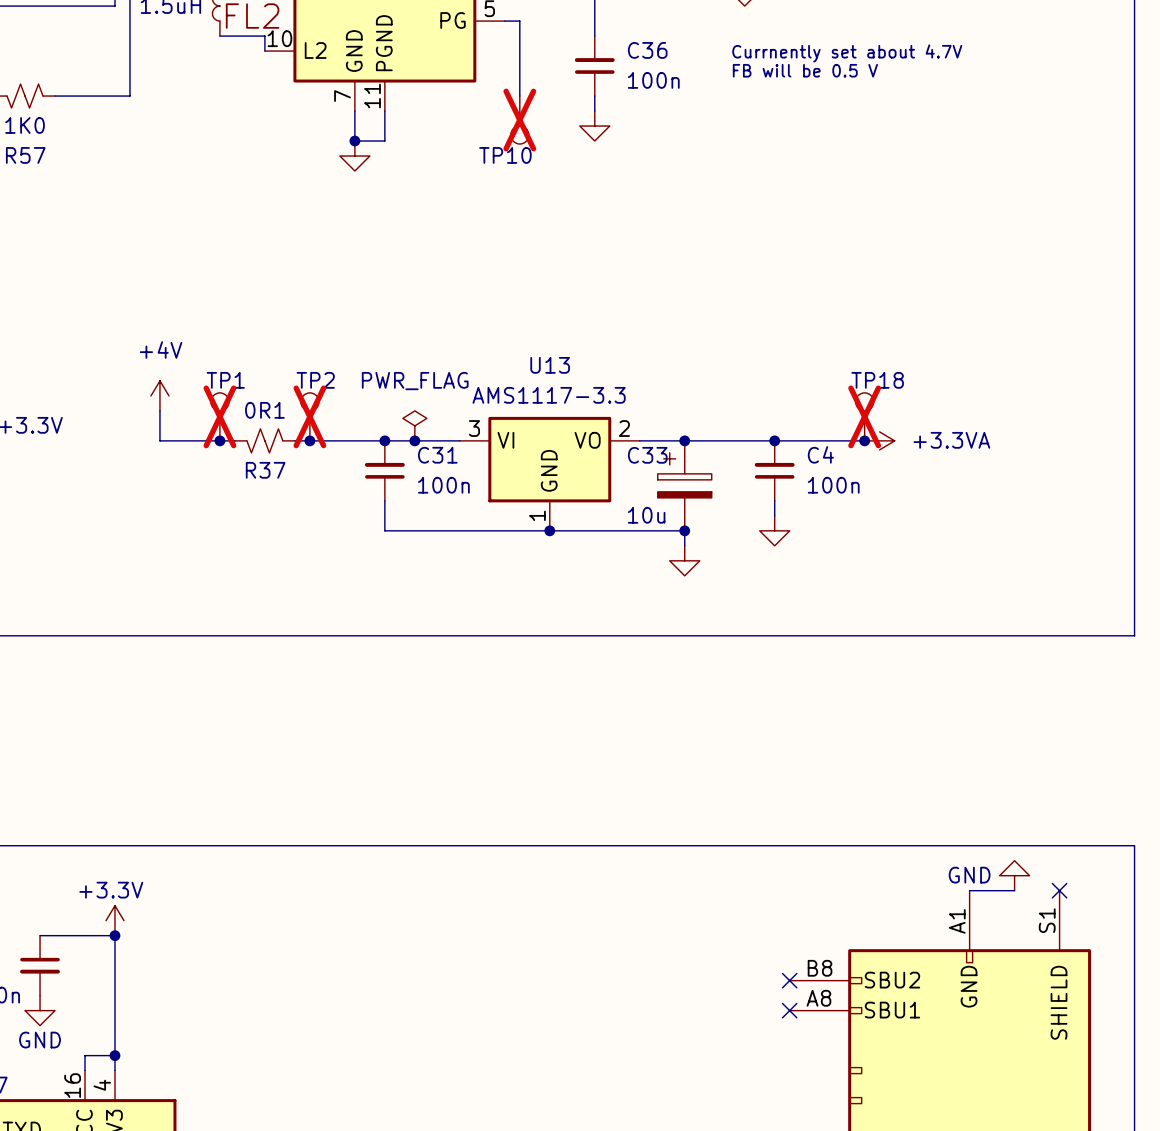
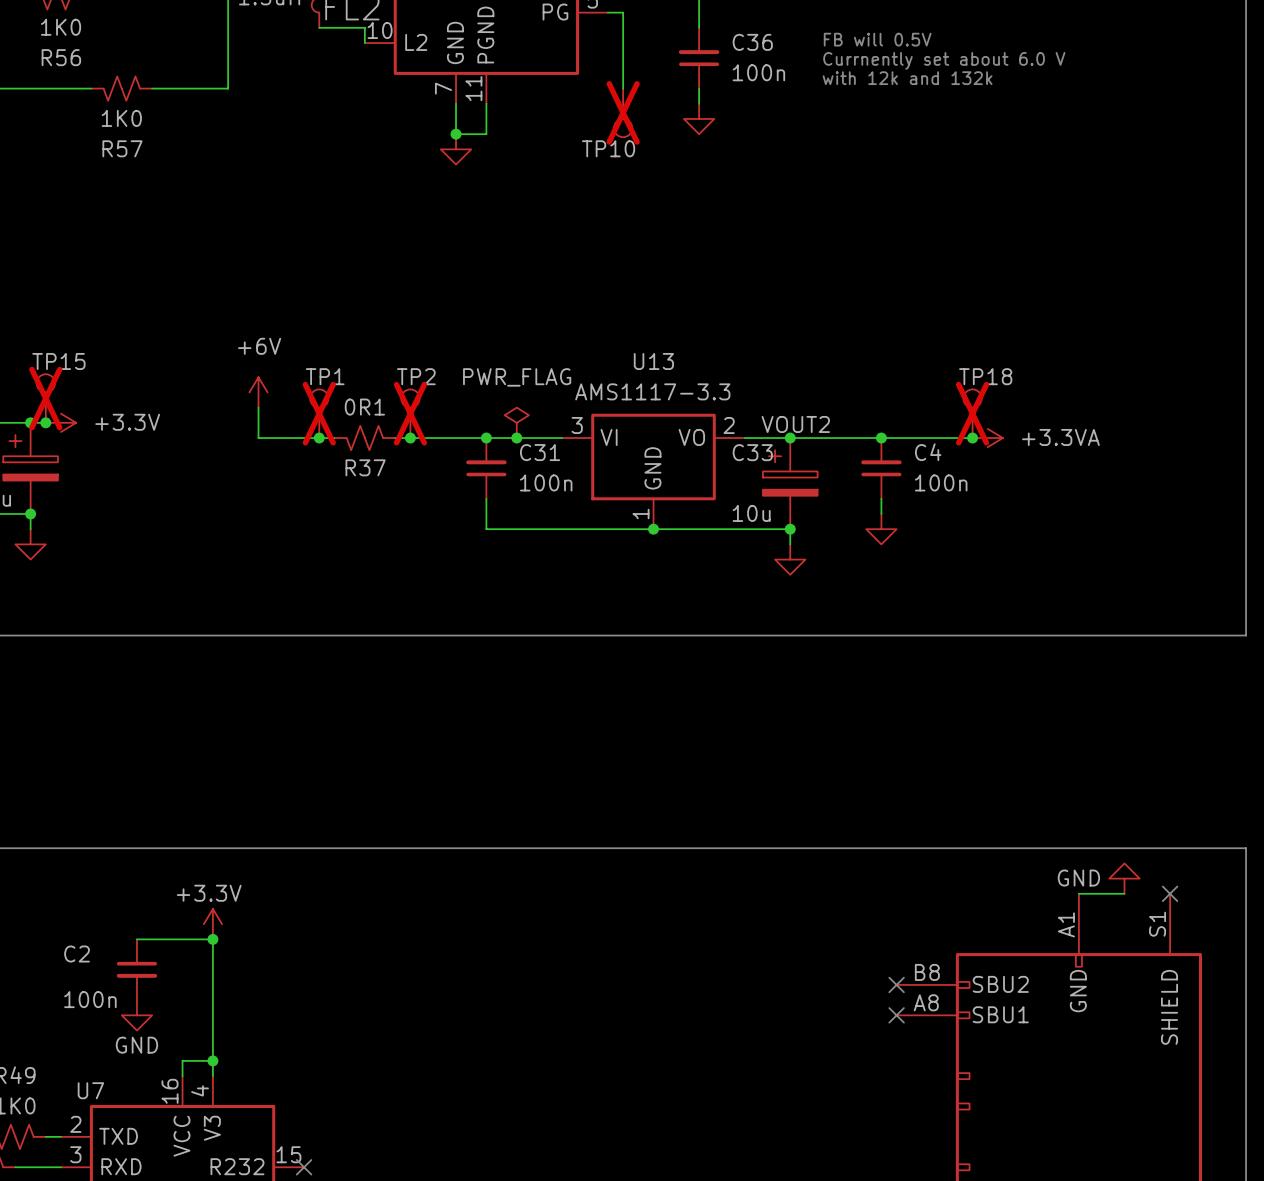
text: Currnently set about 4.7V (847, 53) -> Currnently set about 6.0 V (944, 60)
text: FB will be 0.5 V (805, 70) -> FB will 0.5V (877, 39)
text: none -> with 12k and 132k (907, 78)
power symbol: +4V (159, 395) -> +6V (258, 392)
label: none -> VOUT2 (795, 424)

